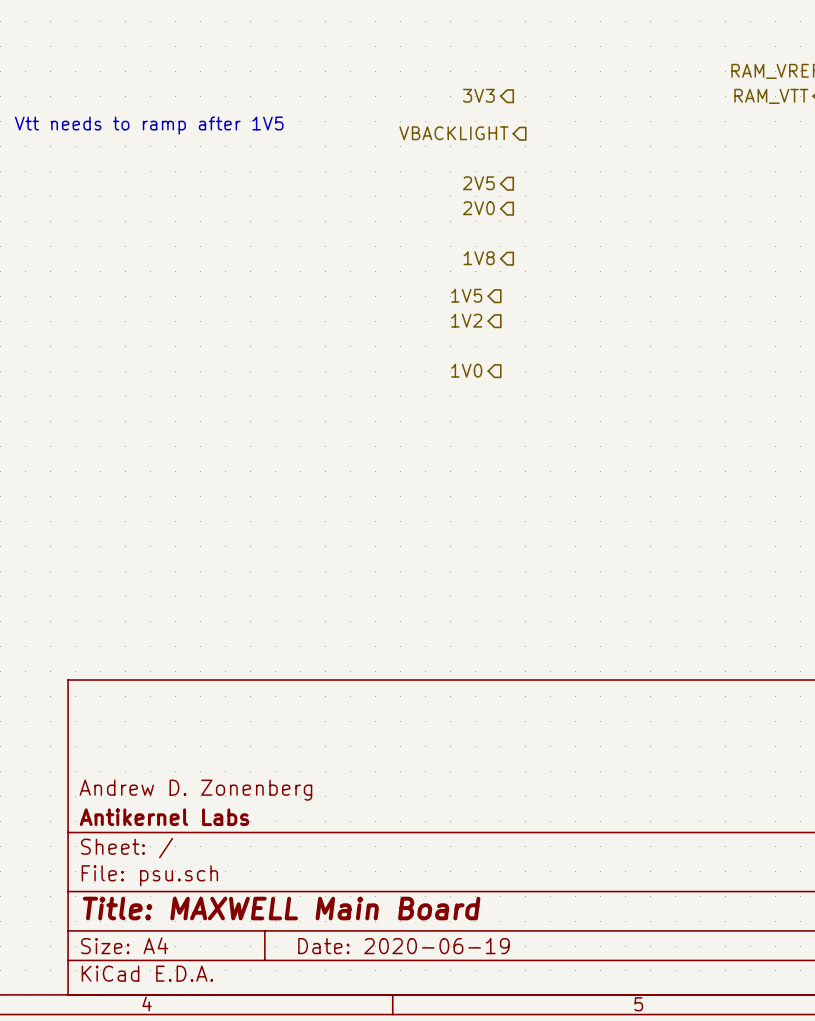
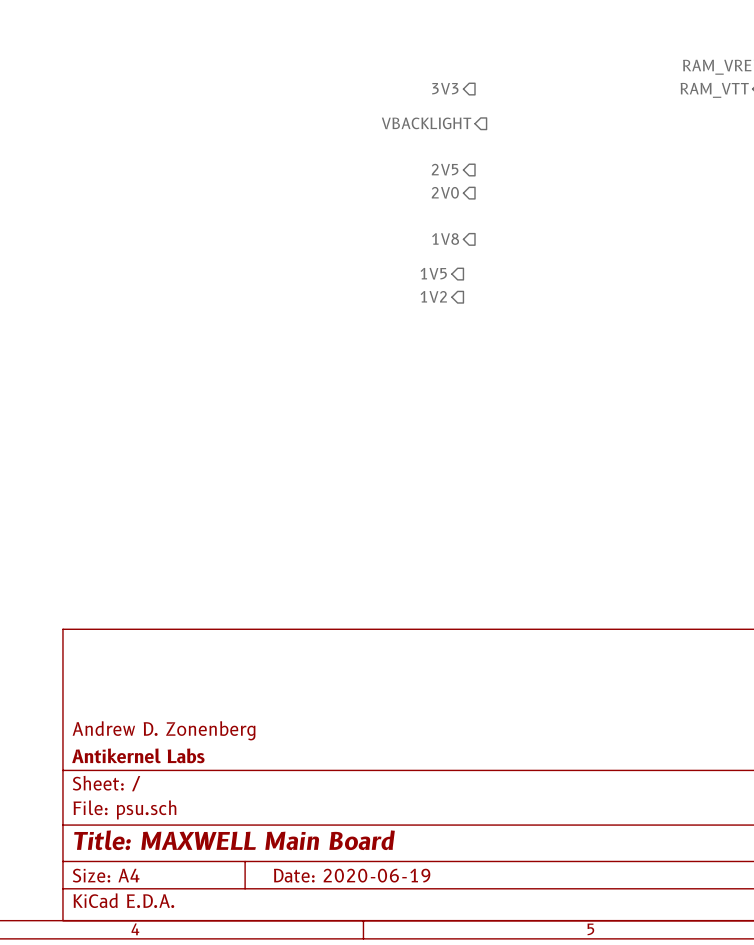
text: Vtt needs to ramp after 1V5 (149, 125) -> none
hierarchical label: 1V0 (466, 370) -> none

